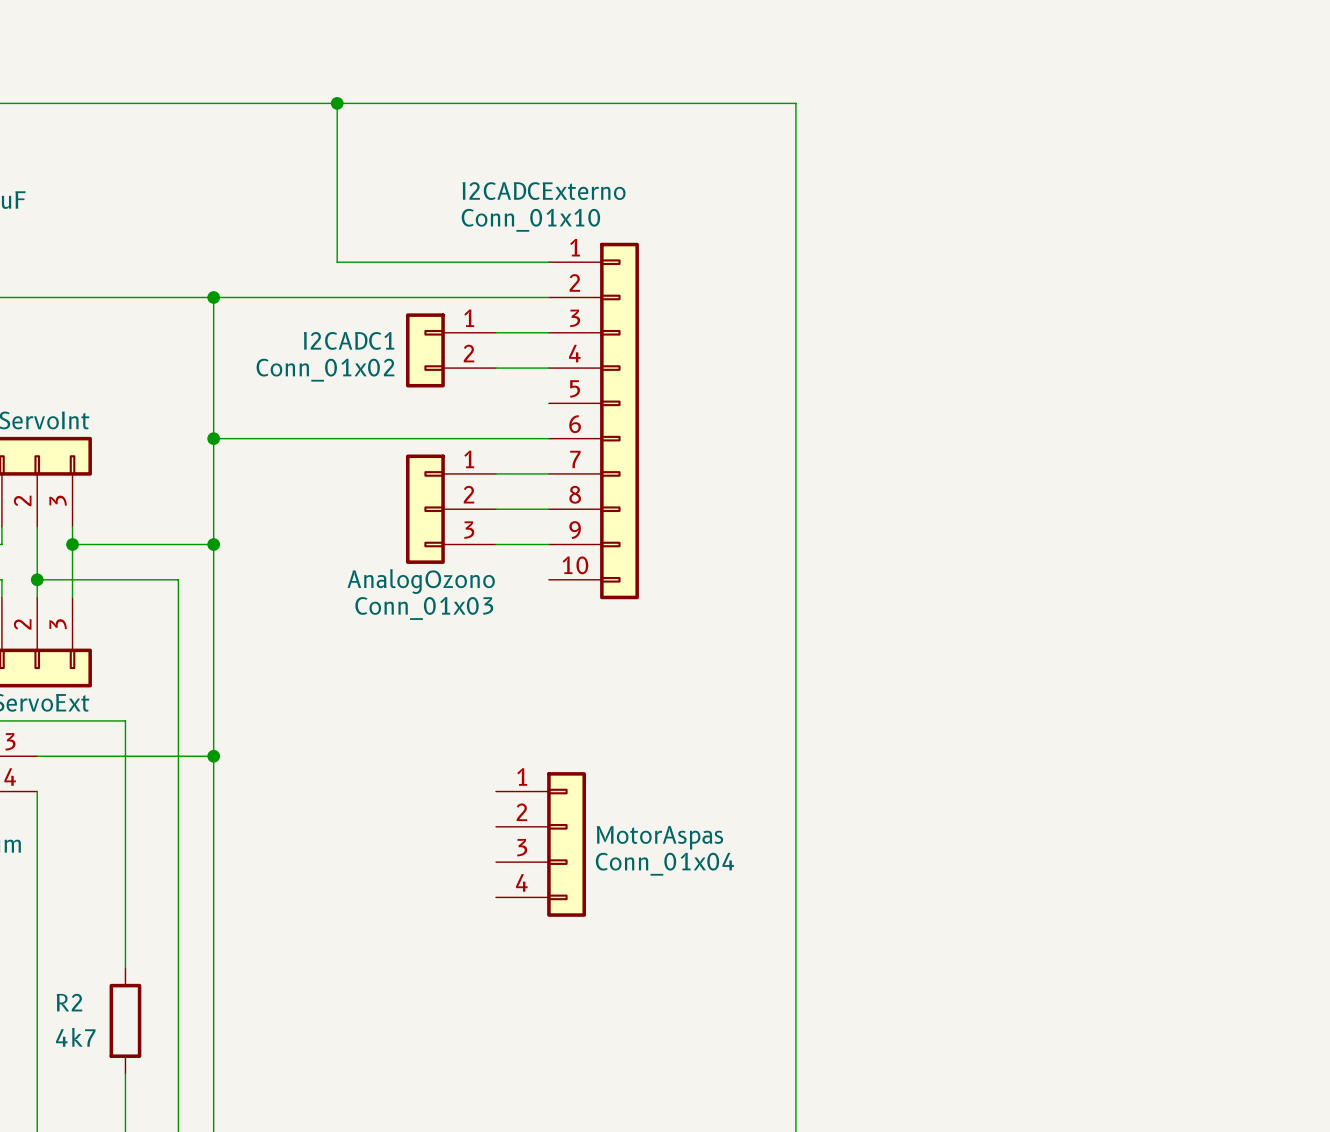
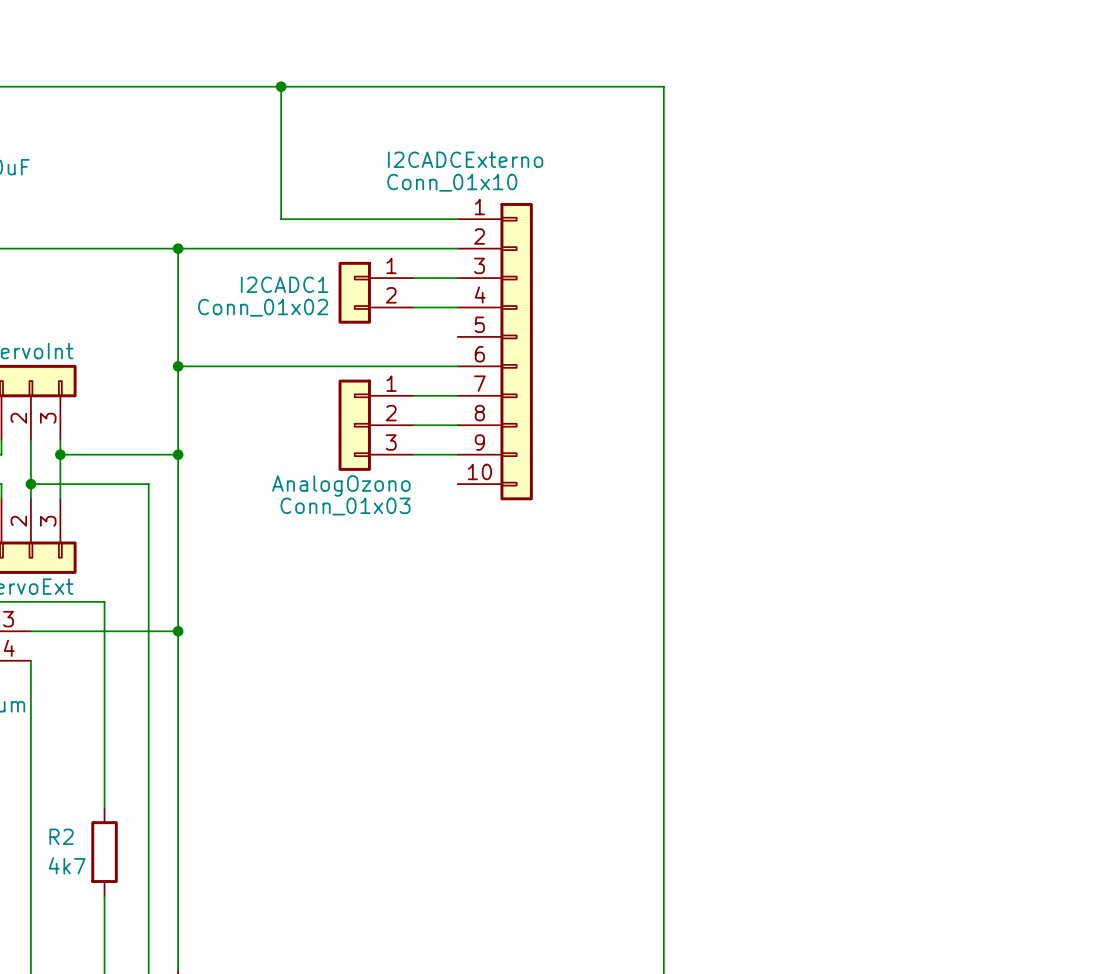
MotorAspas: Conn_01x04 (540, 844) -> none

